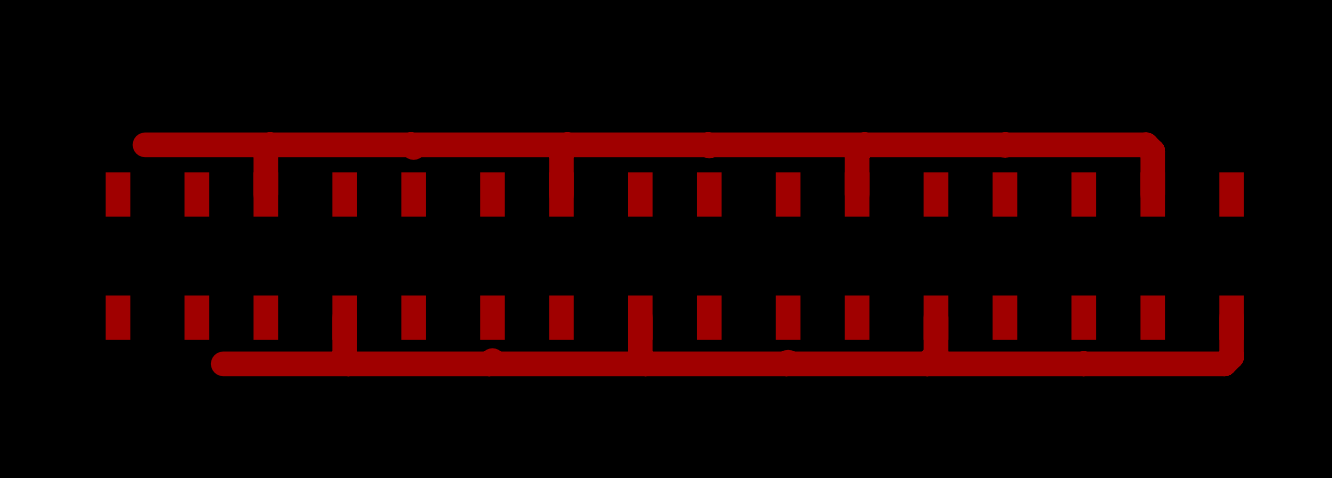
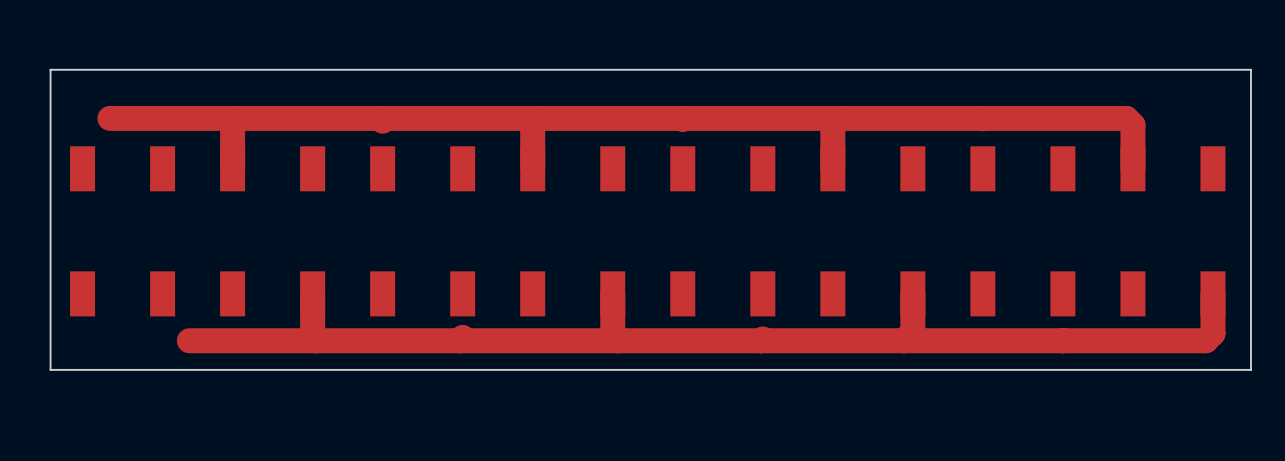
board edge: none -> (1250, 69) (50, 69) (50, 369) (1250, 369) (1250, 69)

